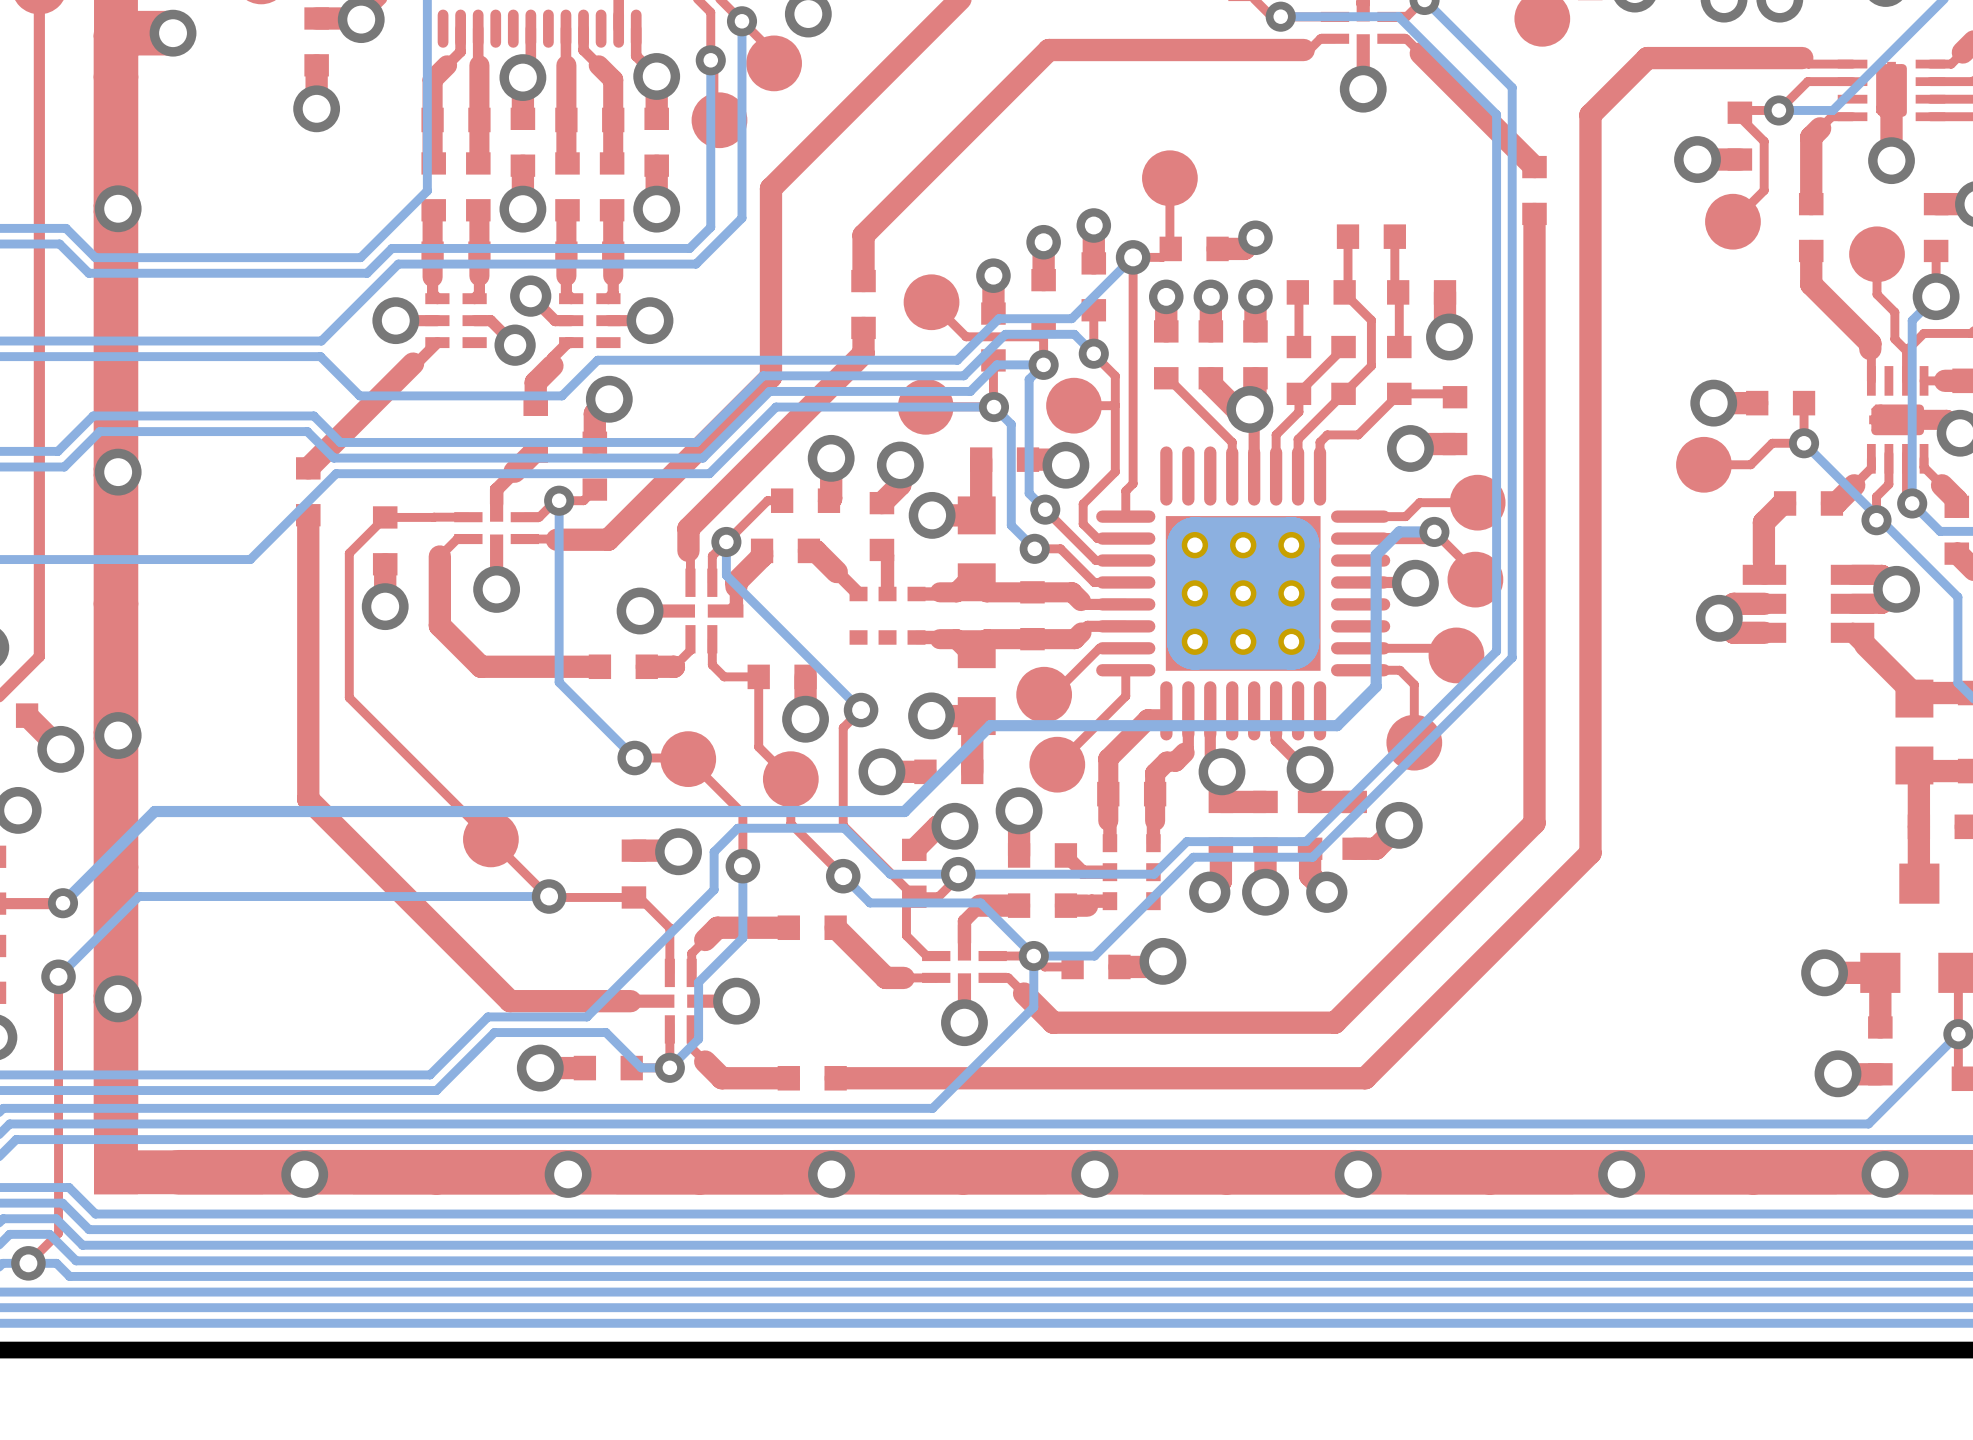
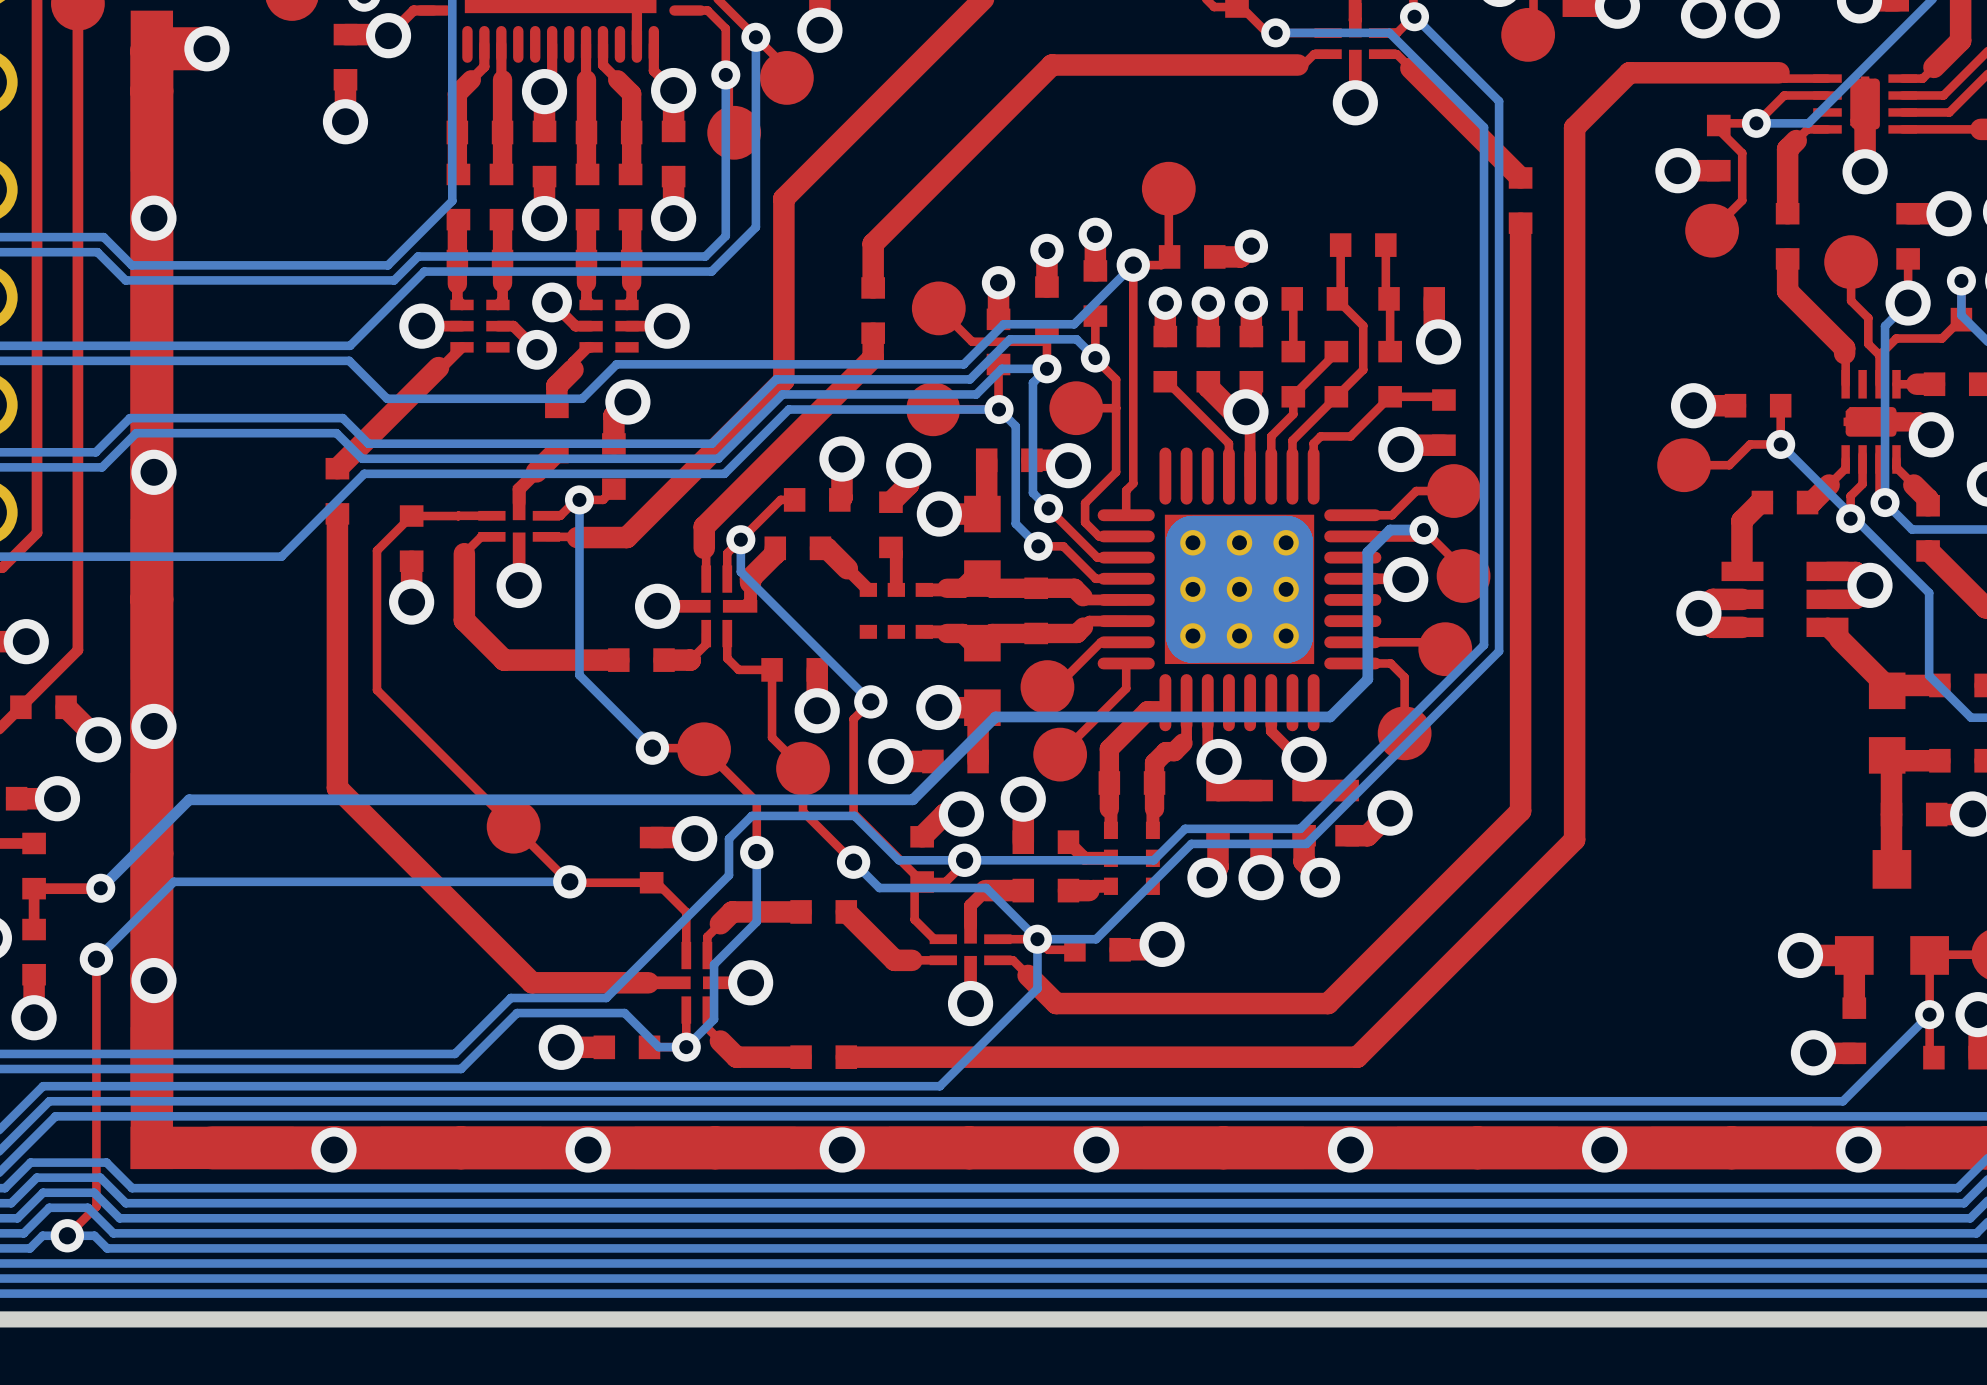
top track: (1477, 502) (1419, 502) (1405, 516) (1401, 516) -> (1453, 491) (1416, 491) (1392, 515)
part position: (1477, 502) -> (1453, 491)

